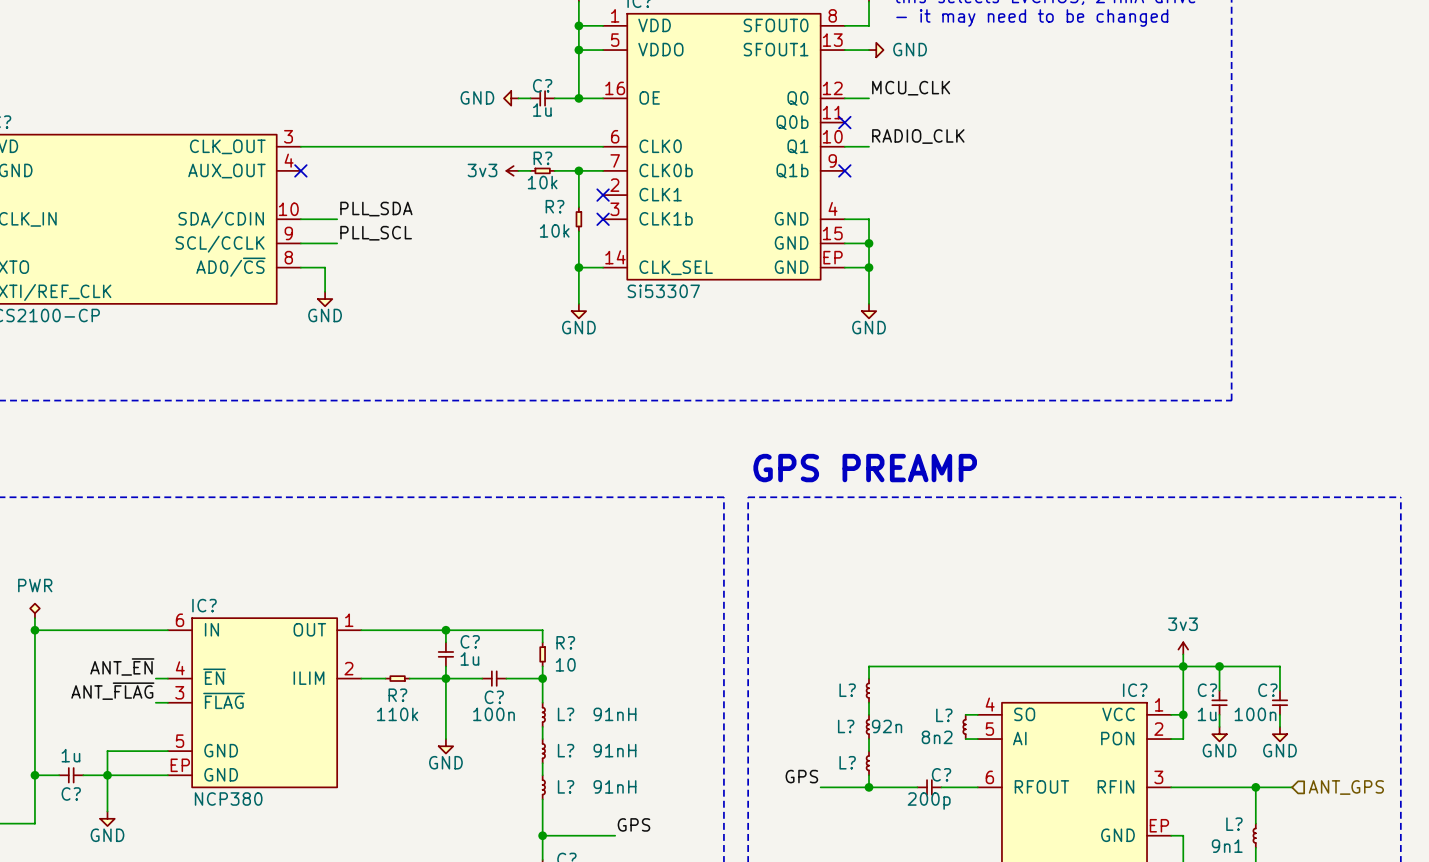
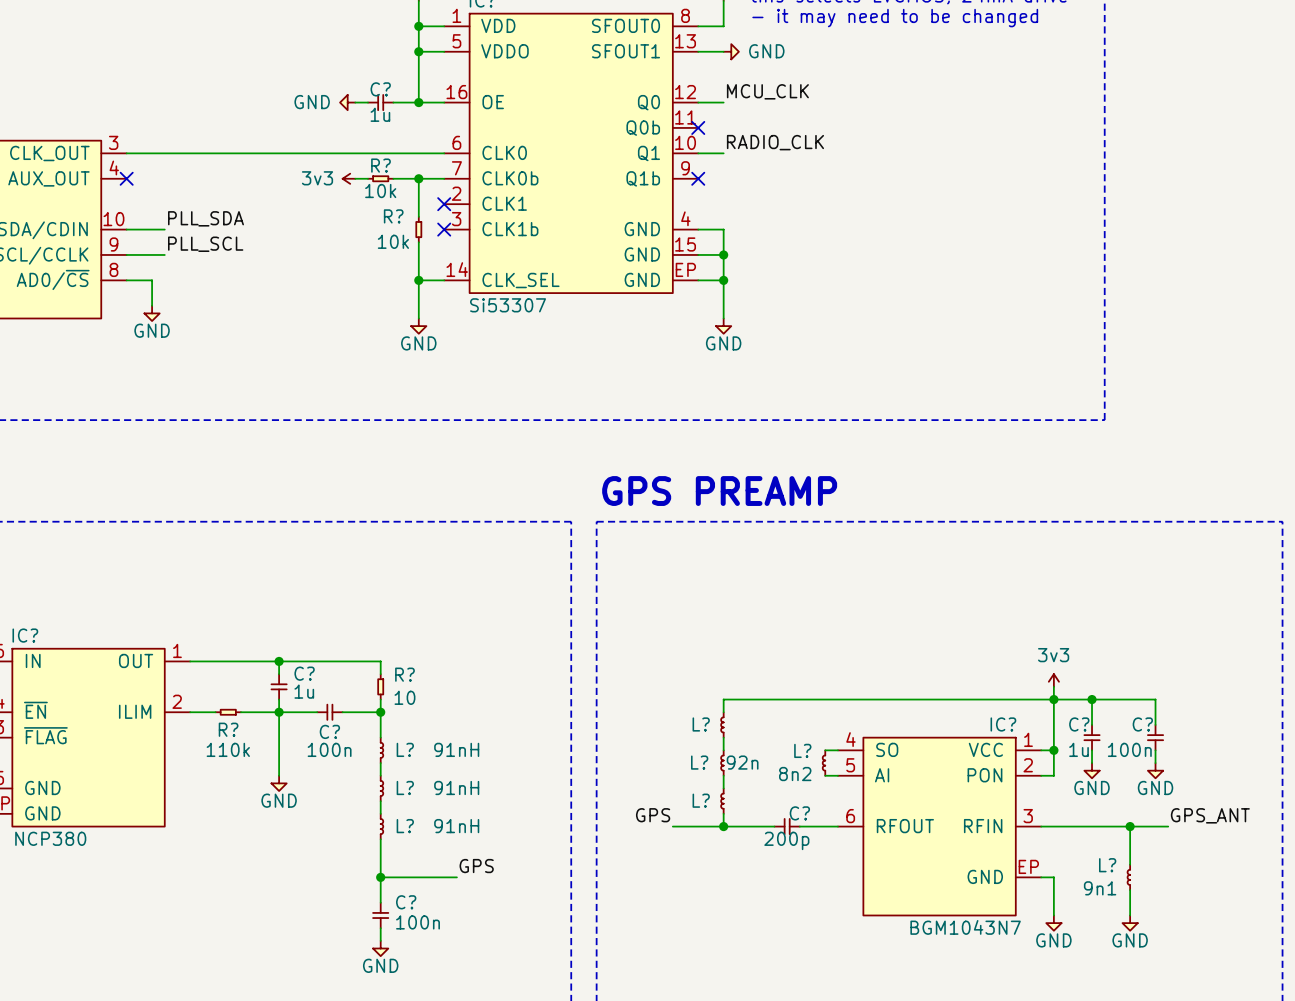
label: none -> GPS_ANT (1210, 815)
hierarchical label: ANT_GPS (1346, 787) -> none

